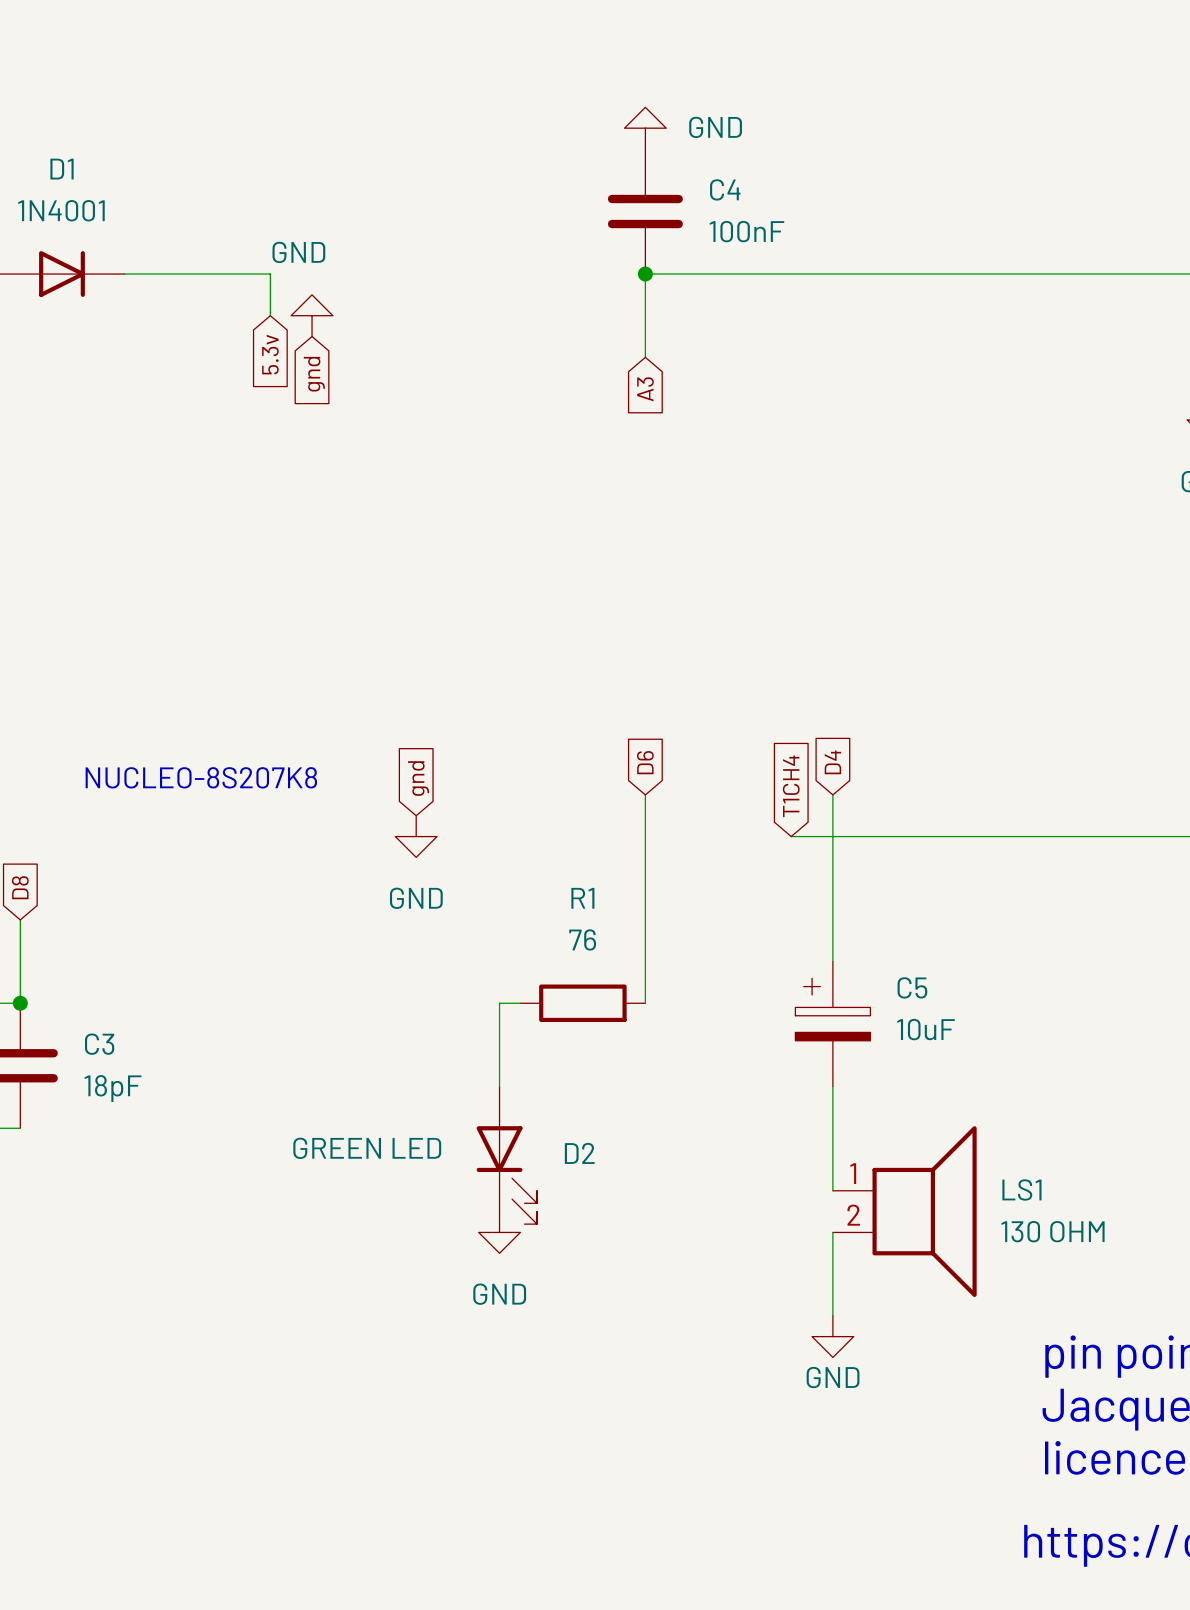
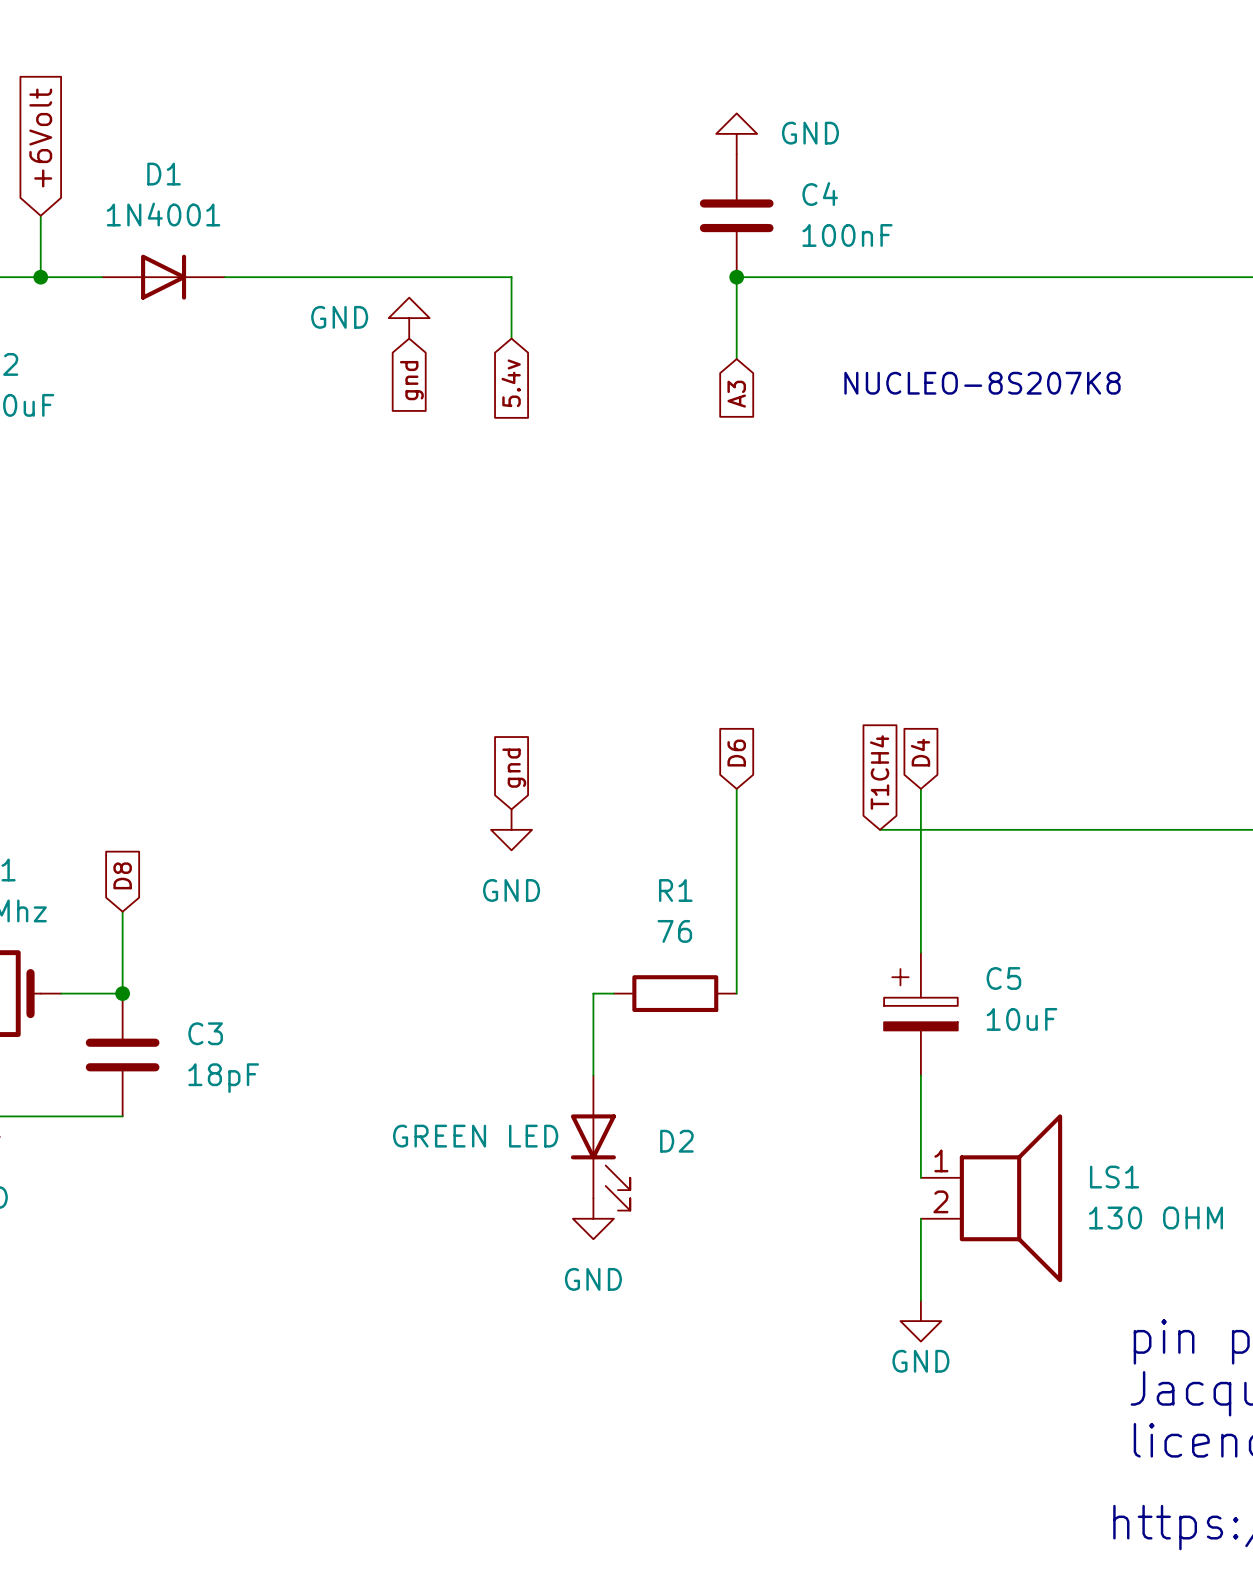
power symbol text position: GND (298, 252) -> GND (339, 317)
wire: (270, 274) (270, 315) -> (368, 277) (511, 277) (511, 338)
global label: 5.3v (270, 354) -> none
global label: none -> 5.4v (511, 383)
text: none -> NUCLEO-8S207K8 (982, 383)
text: NUCLEO-8S207K8 (201, 777) -> none

